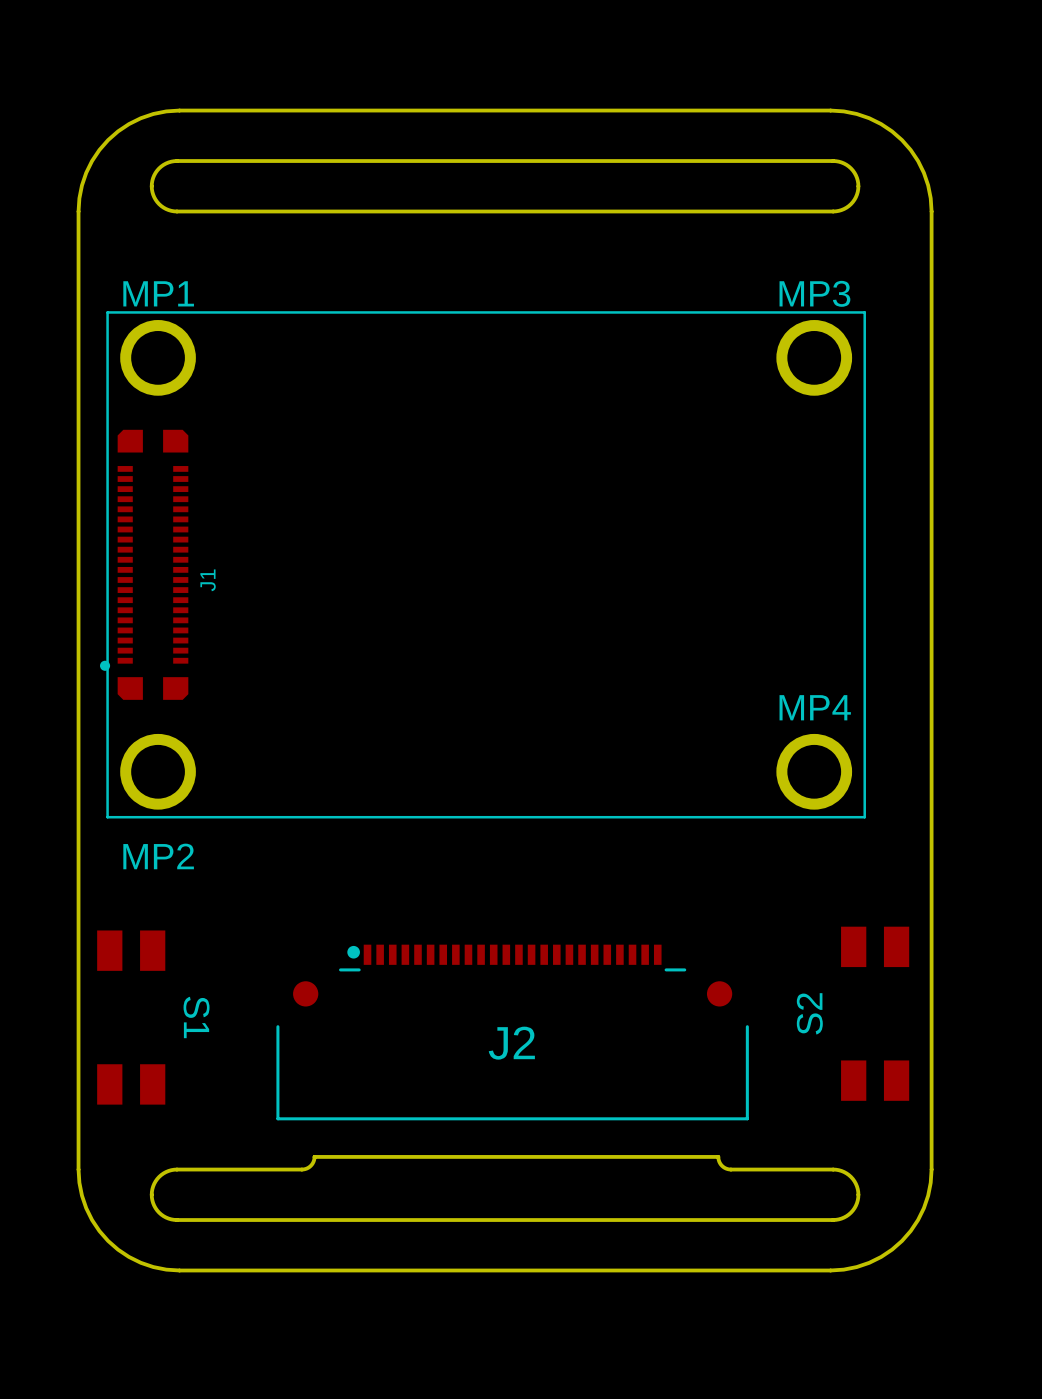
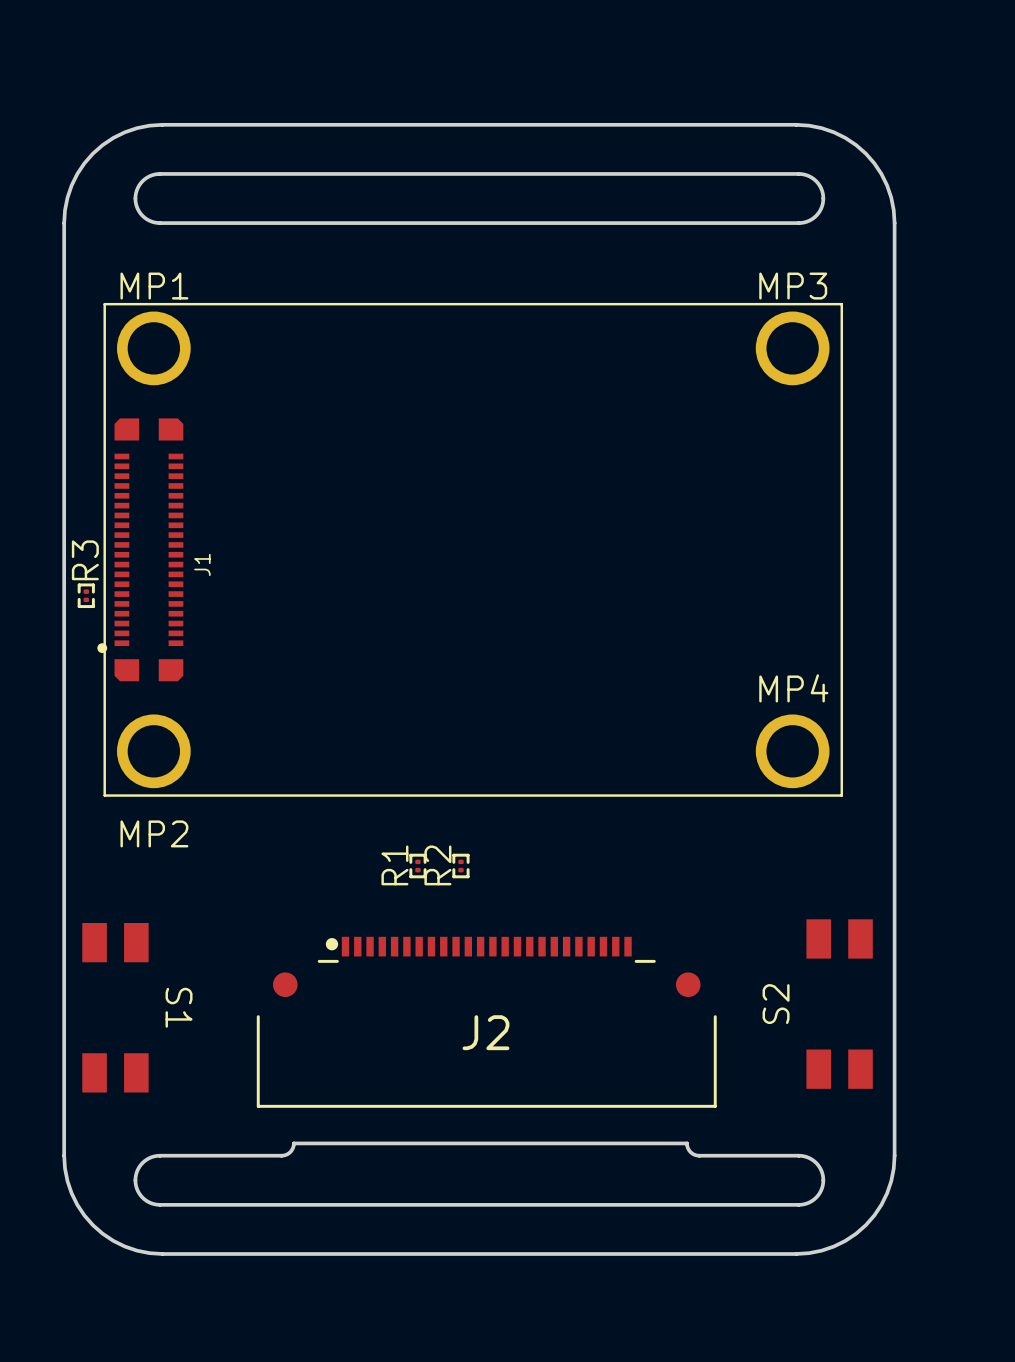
board edge: (179, 110) (843, 111) (856, 113) (881, 124) (902, 140) (918, 161) (928, 185) (931, 211) (931, 1169) (928, 1195) (918, 1220) (902, 1240) (881, 1256) (856, 1267) (830, 1270) (179, 1270) (153, 1267) (129, 1256) (108, 1240) (92, 1220) (81, 1195) (78, 1169) (79, 198) (81, 185) (92, 161) (99, 150) (118, 131) (129, 124) (153, 113) (179, 110) -> (162, 124) (809, 125) (821, 128) (845, 137) (865, 153) (881, 173) (891, 197) (894, 223) (894, 1155) (891, 1181) (881, 1204) (865, 1225) (845, 1240) (821, 1250) (796, 1253) (162, 1253) (137, 1250) (113, 1240) (92, 1225) (77, 1204) (67, 1181) (64, 1155) (65, 210) (67, 197) (77, 173) (92, 153) (113, 137) (124, 132) (149, 125) (162, 124)
board edge: (176, 161) (833, 161) (844, 163) (851, 168) (855, 175) (858, 186) (855, 197) (851, 204) (841, 210) (833, 211) (176, 211) (168, 210) (159, 204) (153, 194) (151, 186) (154, 175) (159, 168) (166, 163) (176, 161) -> (159, 173) (798, 173) (809, 176) (816, 181) (820, 187) (823, 198) (820, 209) (816, 215) (809, 220) (798, 223) (159, 223) (149, 220) (142, 215) (137, 209) (135, 198) (137, 187) (142, 181) (149, 176) (159, 173)
R3: none -> (86, 595)
R1: none -> (417, 866)
R2: none -> (460, 866)
S2 position: (875, 1013) -> (839, 1004)
S1 position: (131, 1017) -> (115, 1007)
J2 position: (512, 1032) -> (486, 1022)
board edge: (314, 1156) (718, 1156) (720, 1164) (729, 1169) (841, 1170) (854, 1181) (858, 1197) (851, 1212) (844, 1217) (833, 1220) (176, 1220) (161, 1214) (152, 1200) (152, 1189) (155, 1181) (161, 1175) (171, 1170) (303, 1169) (310, 1165) (314, 1156) -> (293, 1143) (686, 1143) (690, 1152) (697, 1155) (806, 1157) (819, 1167) (823, 1183) (816, 1197) (809, 1202) (798, 1204) (159, 1204) (144, 1199) (136, 1185) (135, 1177) (139, 1167) (144, 1161) (154, 1156) (283, 1155) (290, 1152) (293, 1143)

